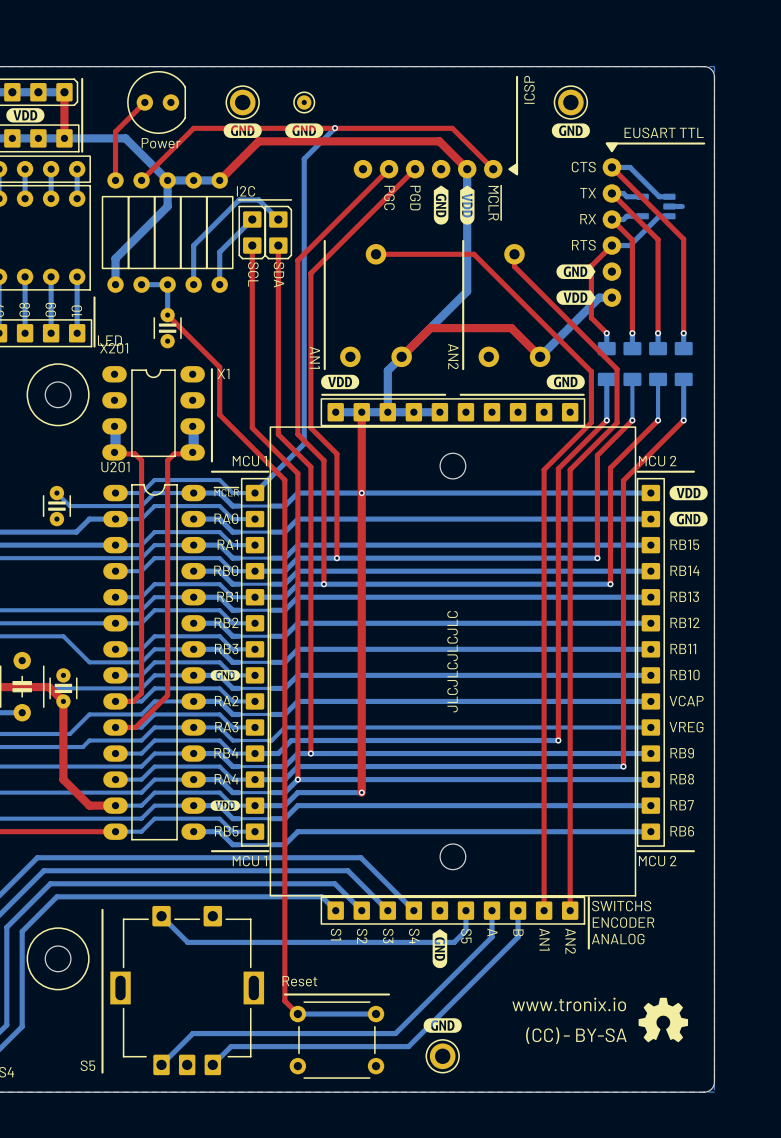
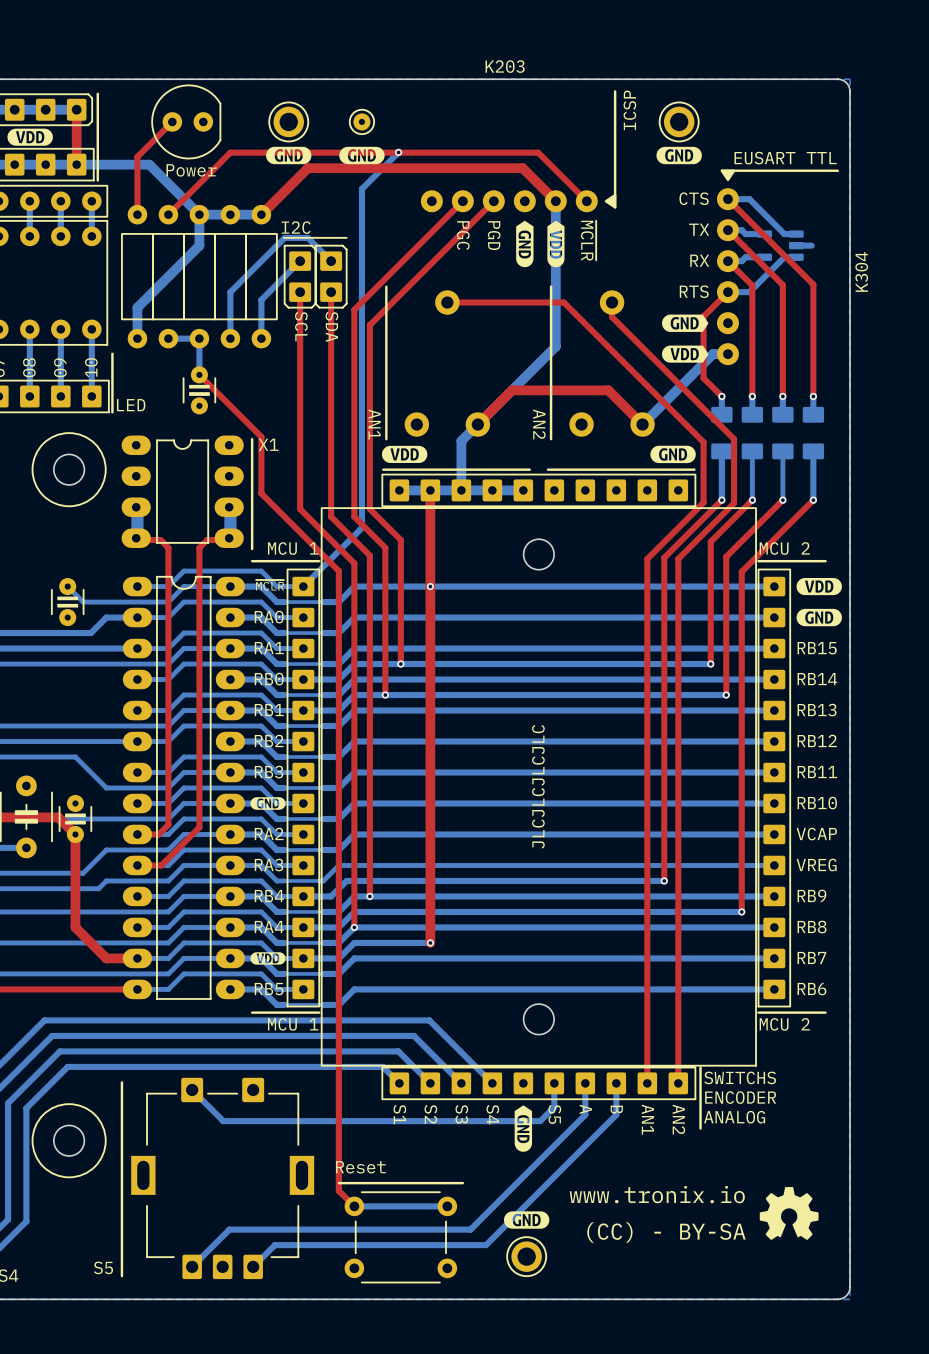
K203 name: none -> K203 (505, 66)
K304 name: none -> K304 (861, 271)
X201 name: X201 (114, 348) -> none
U201 name: U201 (115, 467) -> none
part footprint: [110, 905, 265, 1076] -> [131, 1077, 315, 1280]

